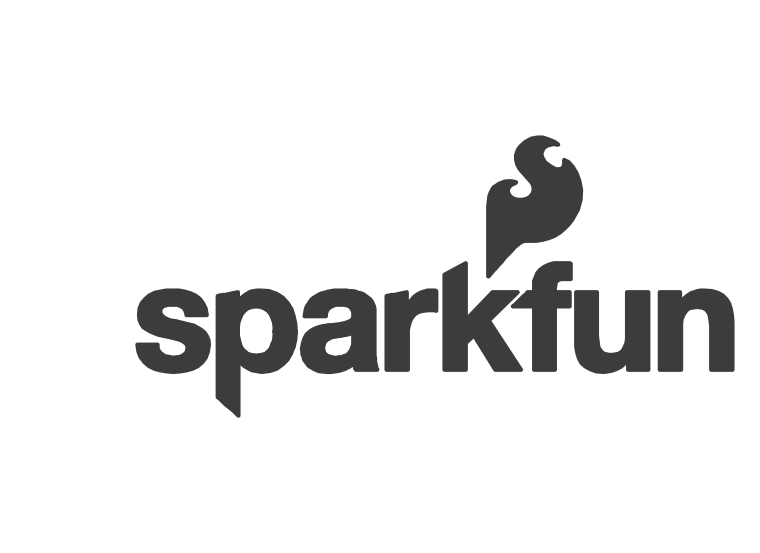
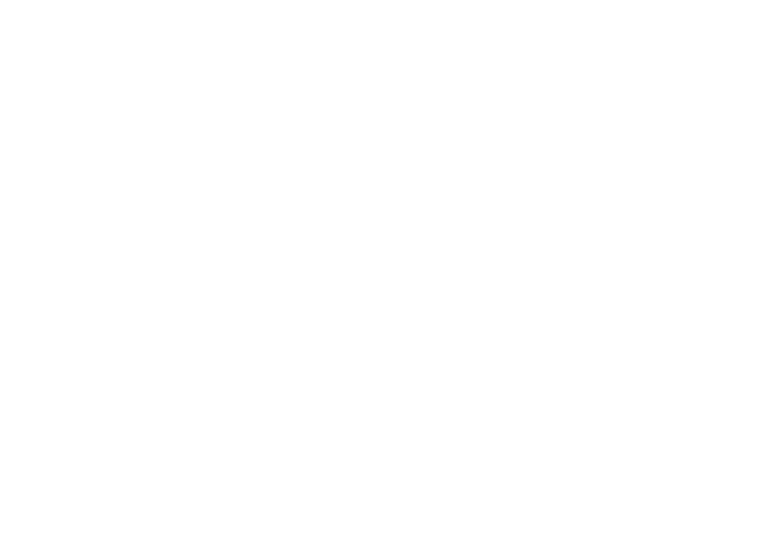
drawing: [135, 135, 735, 418] -> none

